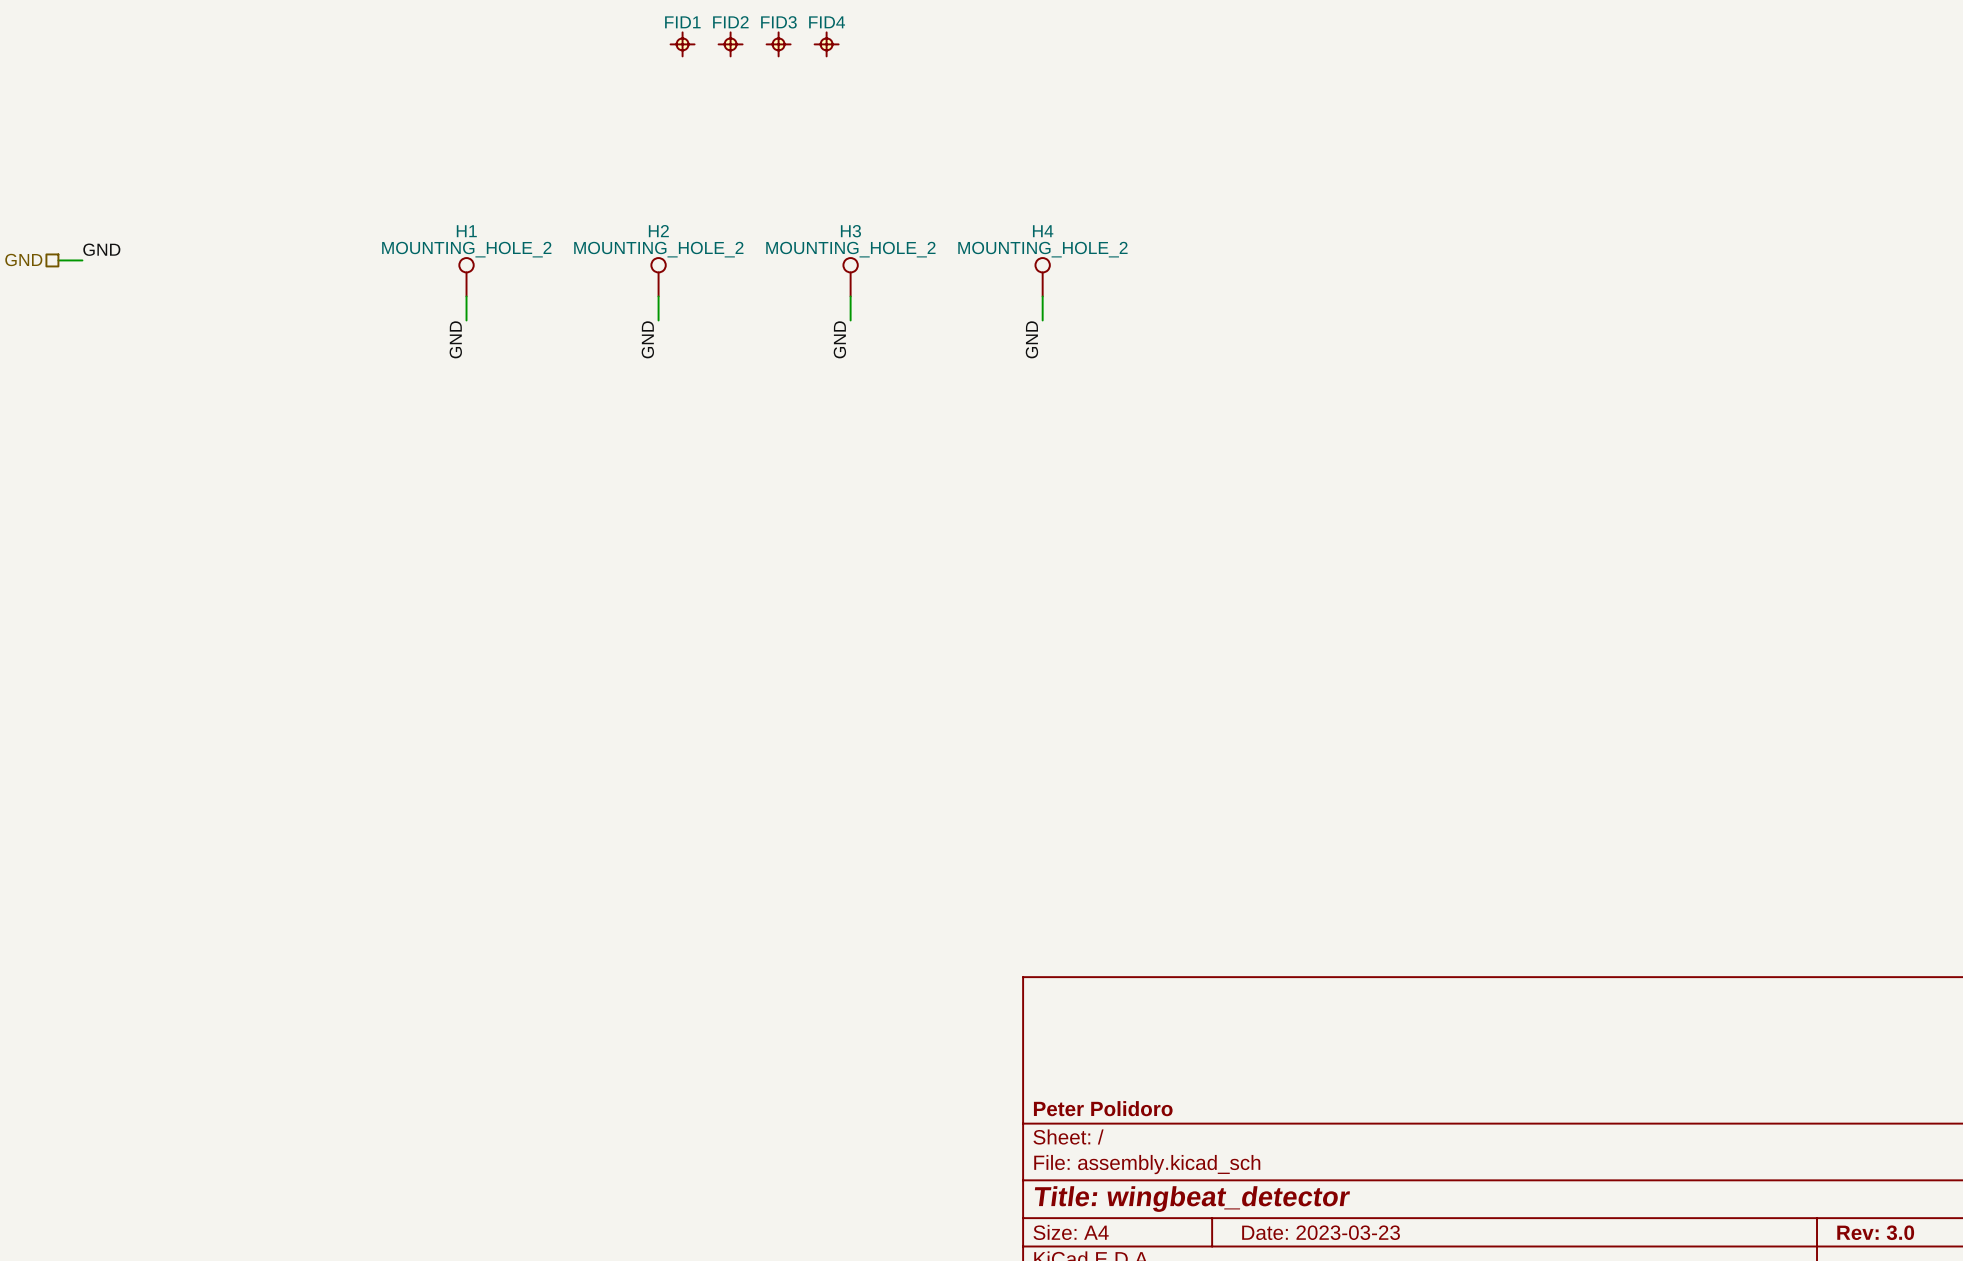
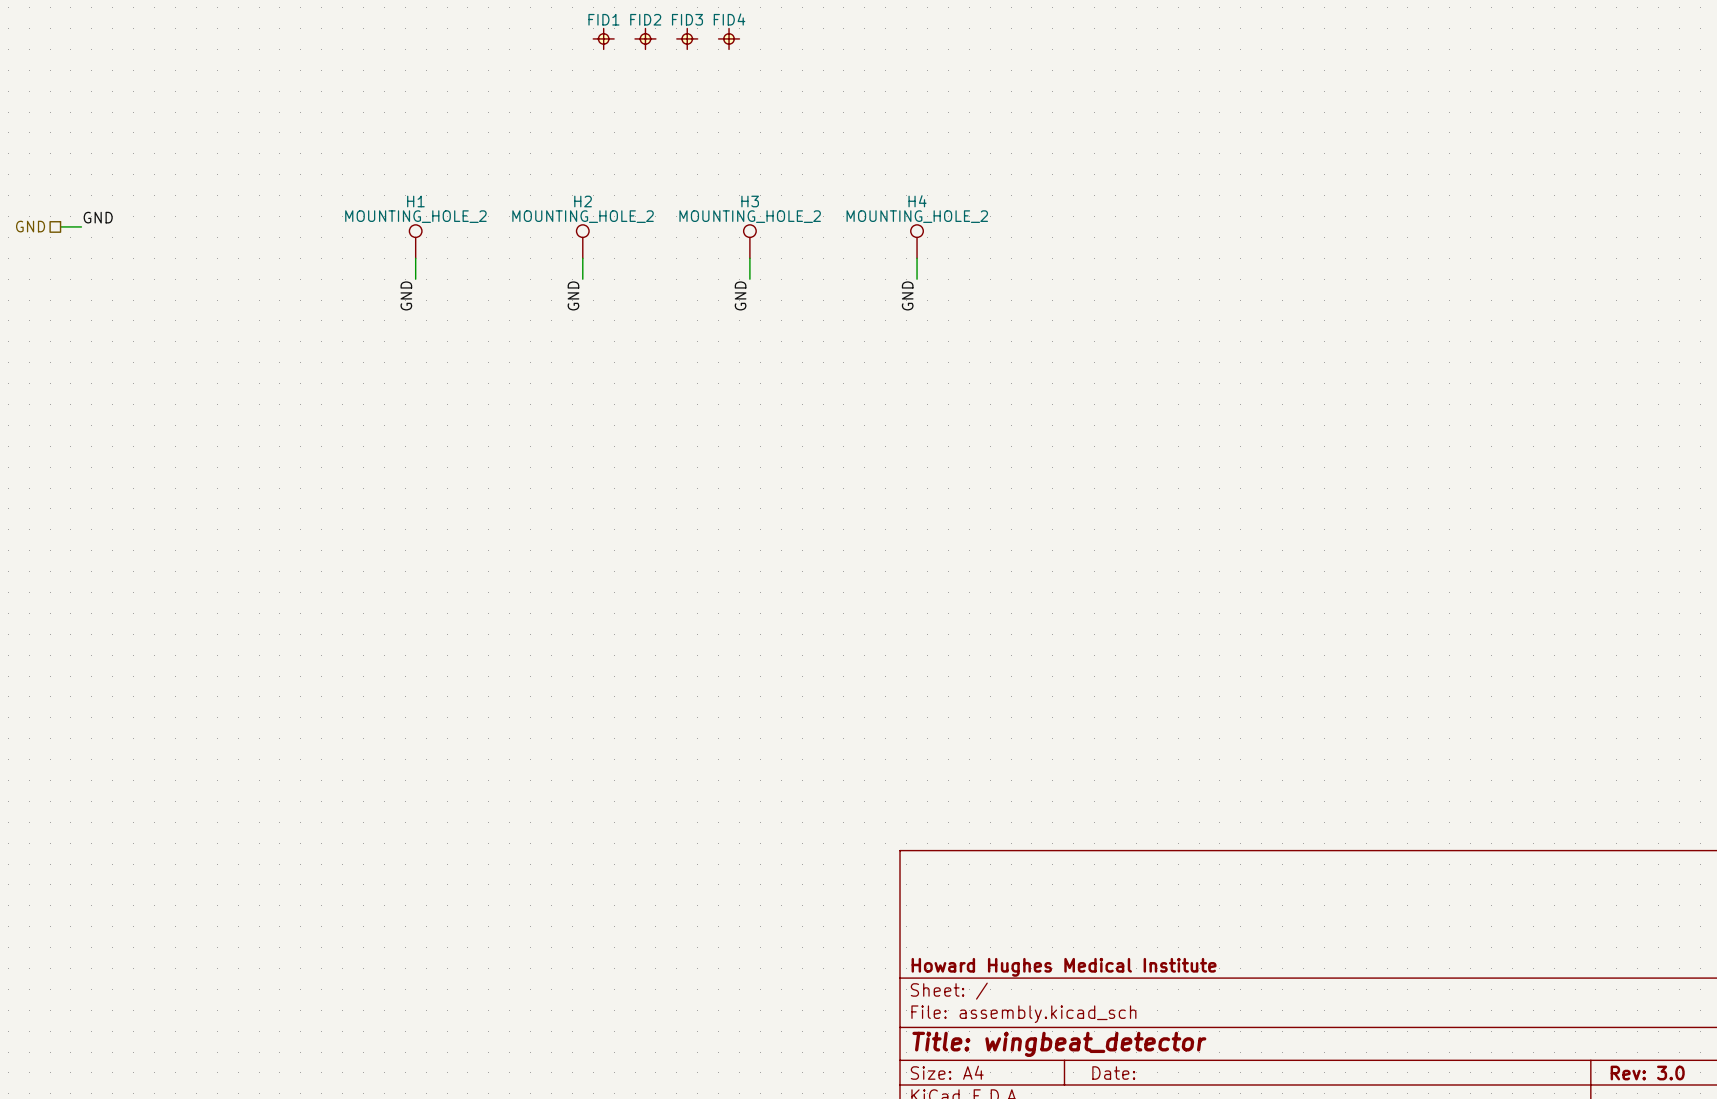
title block: Peter Polidoro (1103, 1108) -> Howard Hughes Medical Institute (1064, 967)
title block: Date: 2023-03-23 (1321, 1232) -> Date: (1113, 1073)

